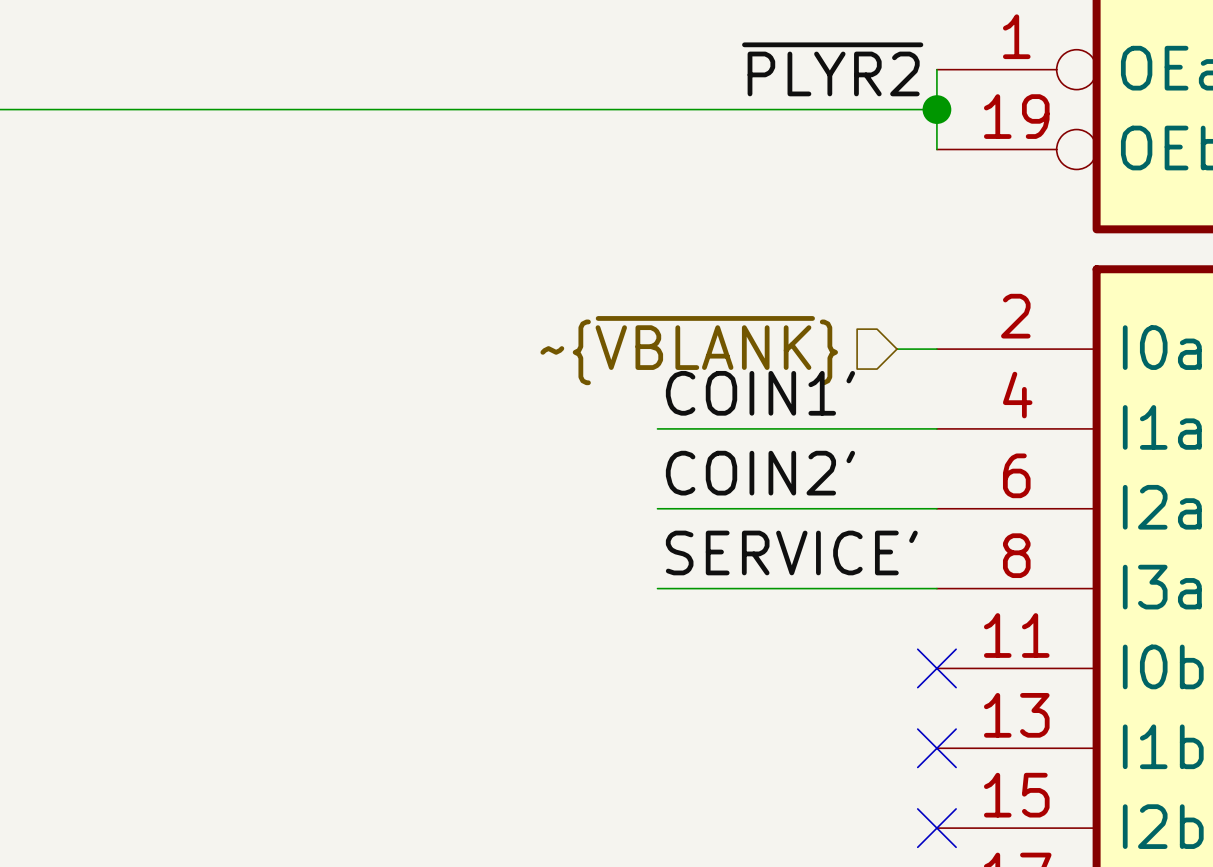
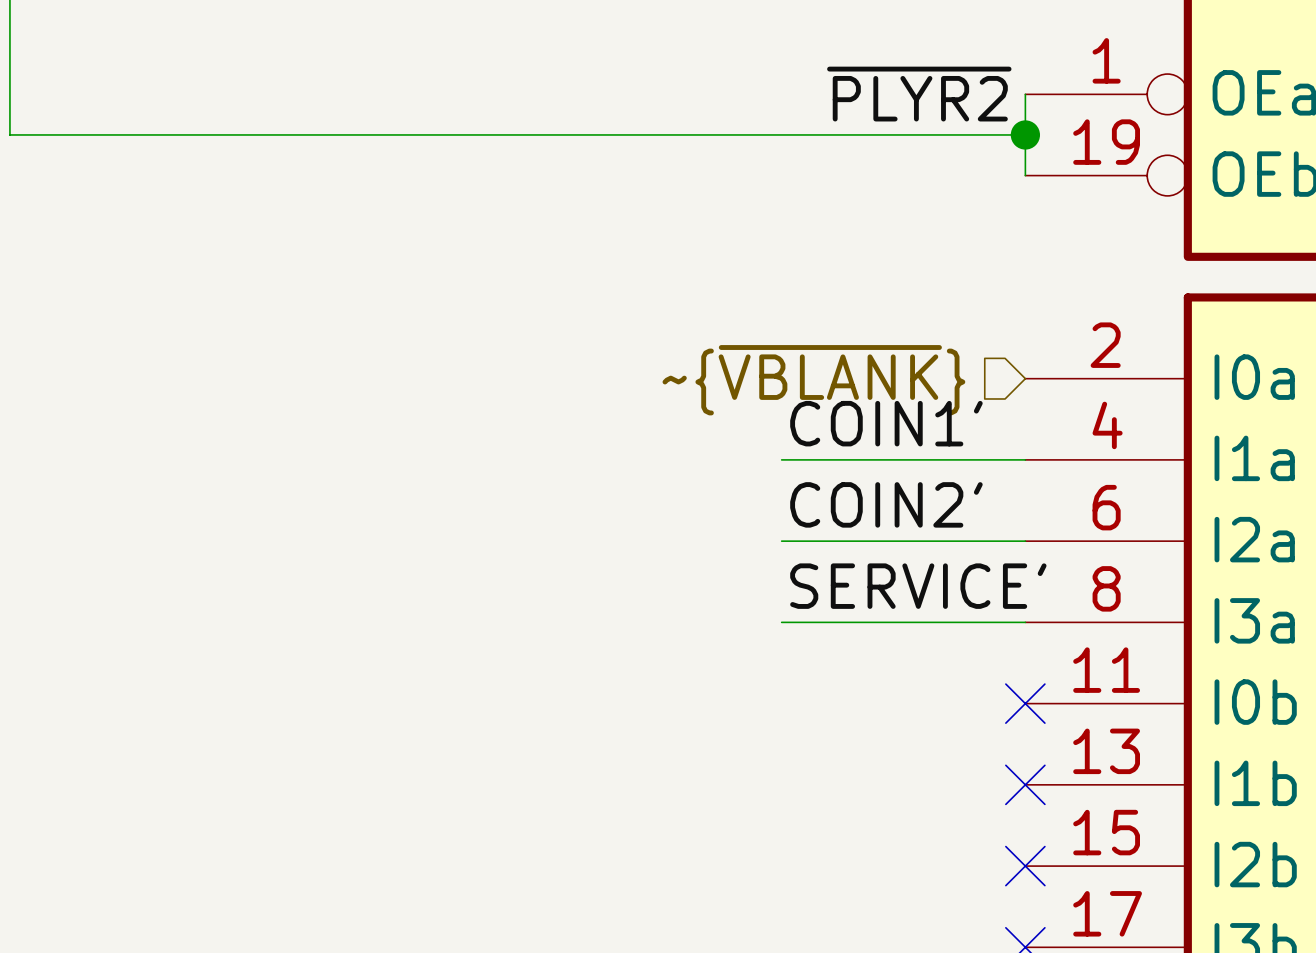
wire: (897, 349) (936, 349) -> none
hierarchical label position: ~{~{VBLANK}} (689, 350) -> ~{~{VBLANK}} (813, 380)
label position: COIN1' (760, 393) -> COIN1' (886, 423)
wire: (657, 428) (697, 428) -> none
label position: COIN2' (760, 473) -> COIN2' (886, 504)
wire: (657, 508) (697, 508) -> none
label position: SERVICE' (791, 552) -> SERVICE' (918, 586)
wire: (657, 588) (697, 588) -> none

